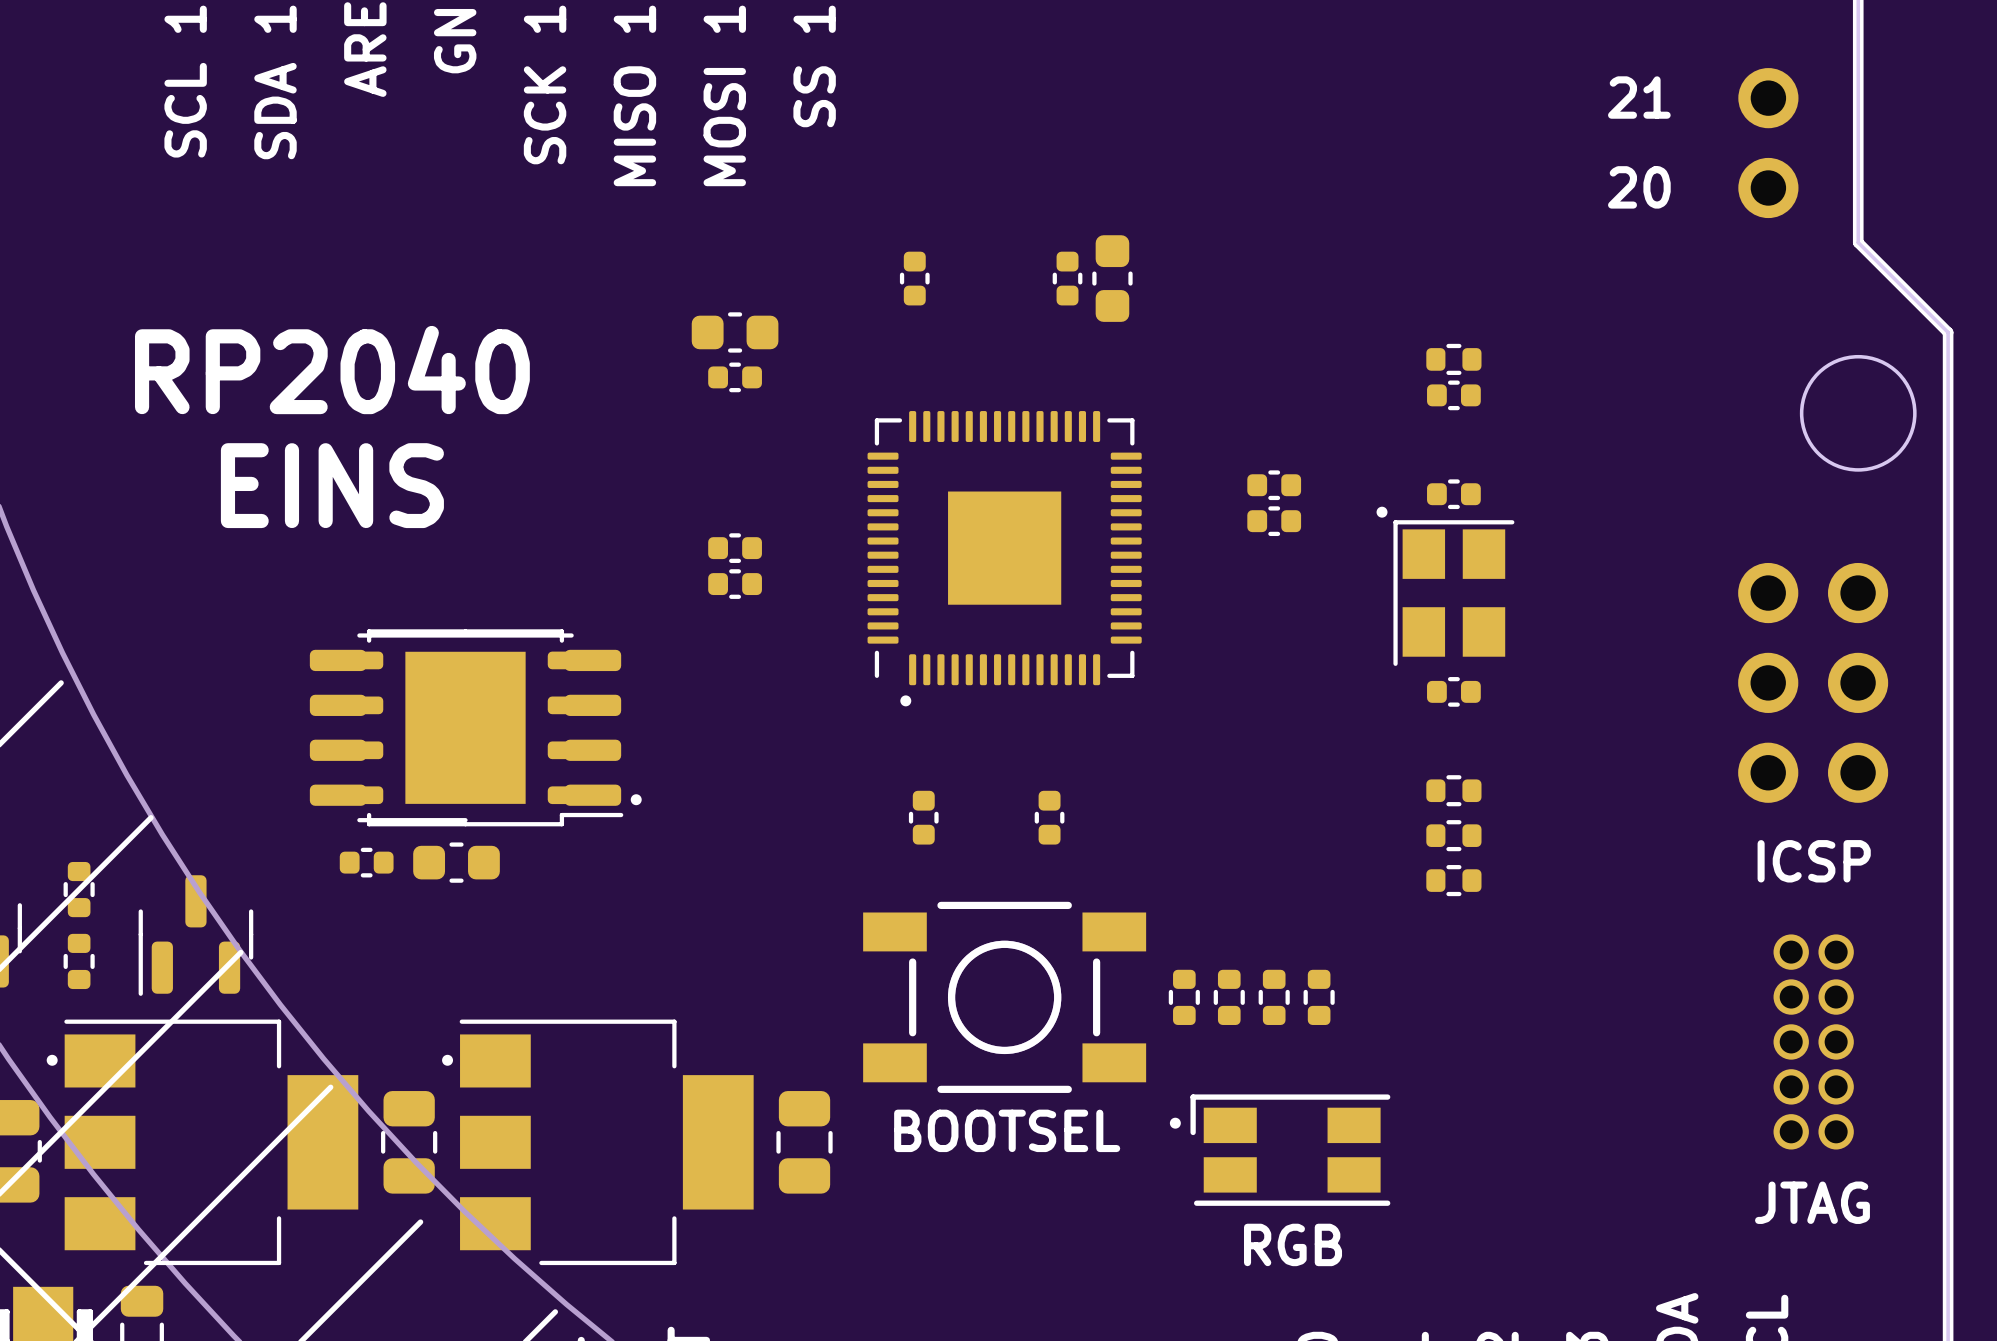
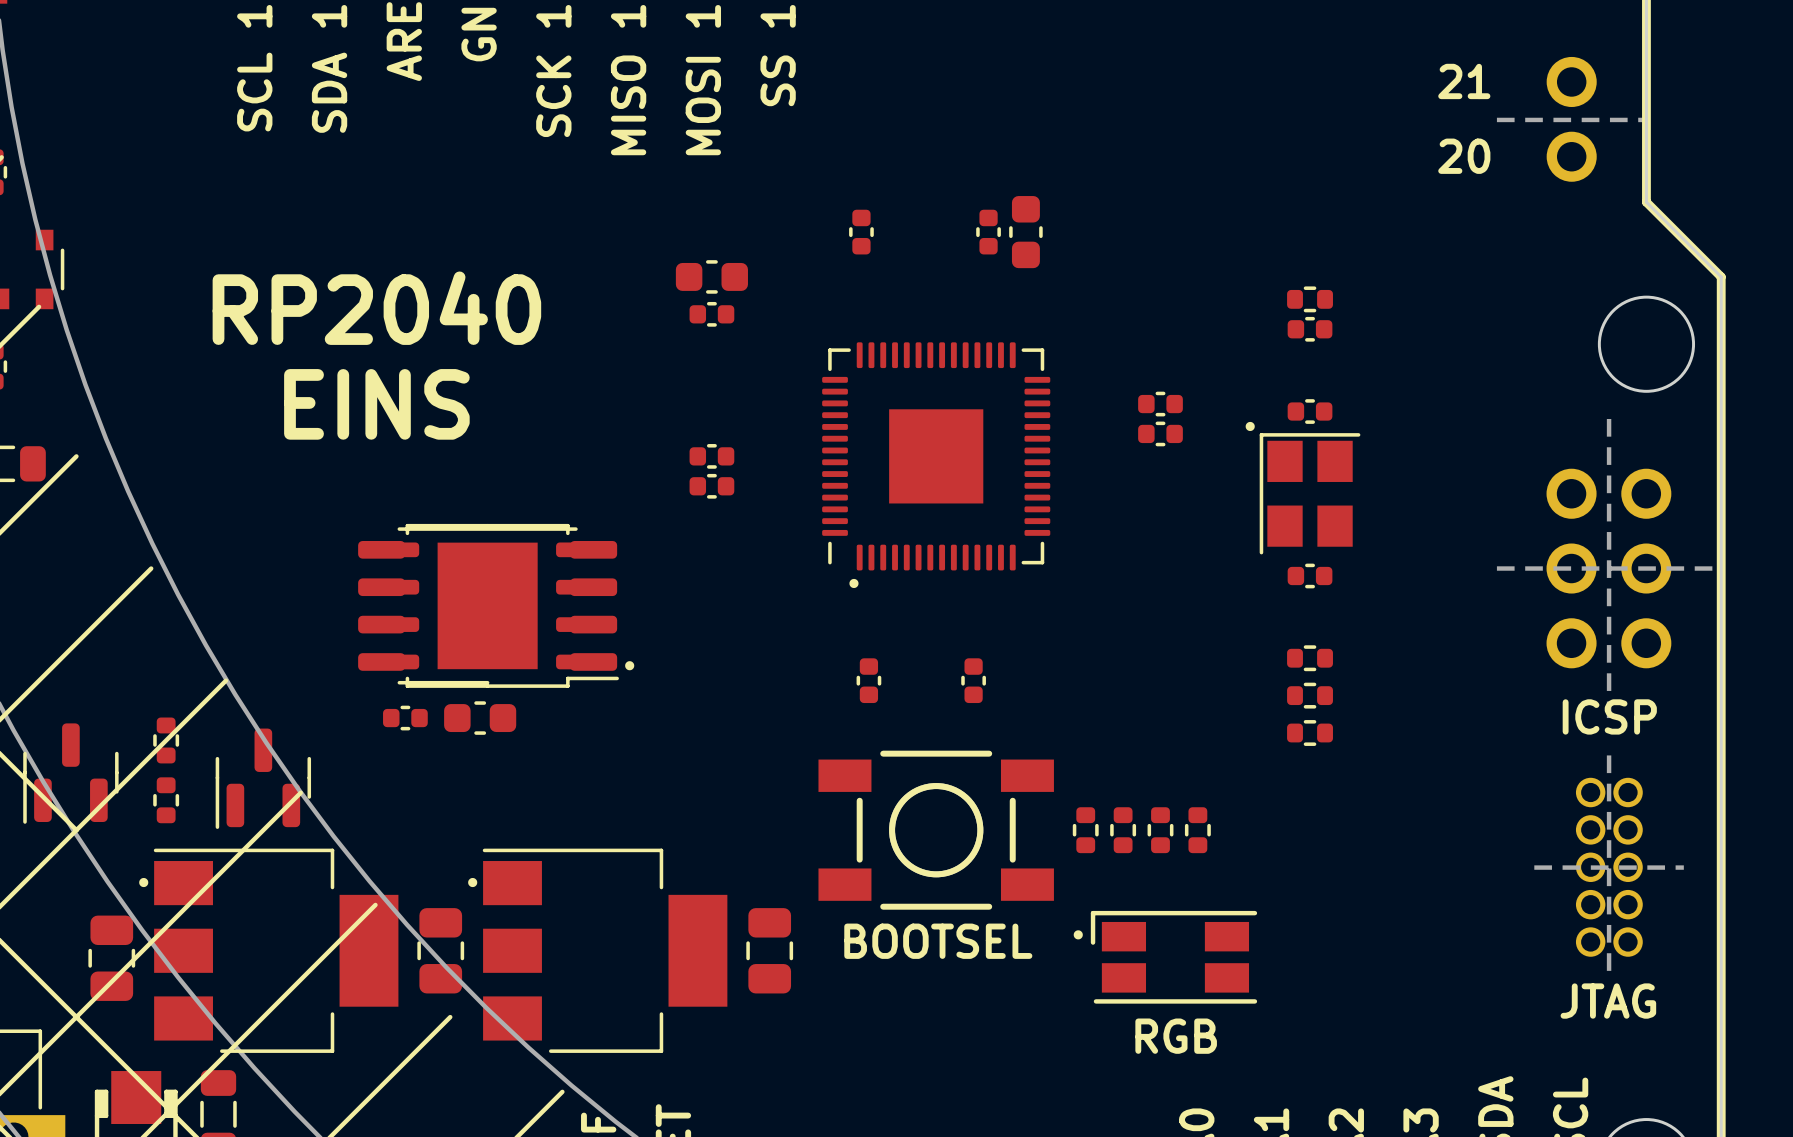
line: none -> (1496, 119) (1646, 119)
line: none -> (1609, 418) (1609, 718)
line: none -> (1496, 568) (1721, 568)
line: none -> (1609, 755) (1609, 979)
line: none -> (1534, 867) (1683, 867)

